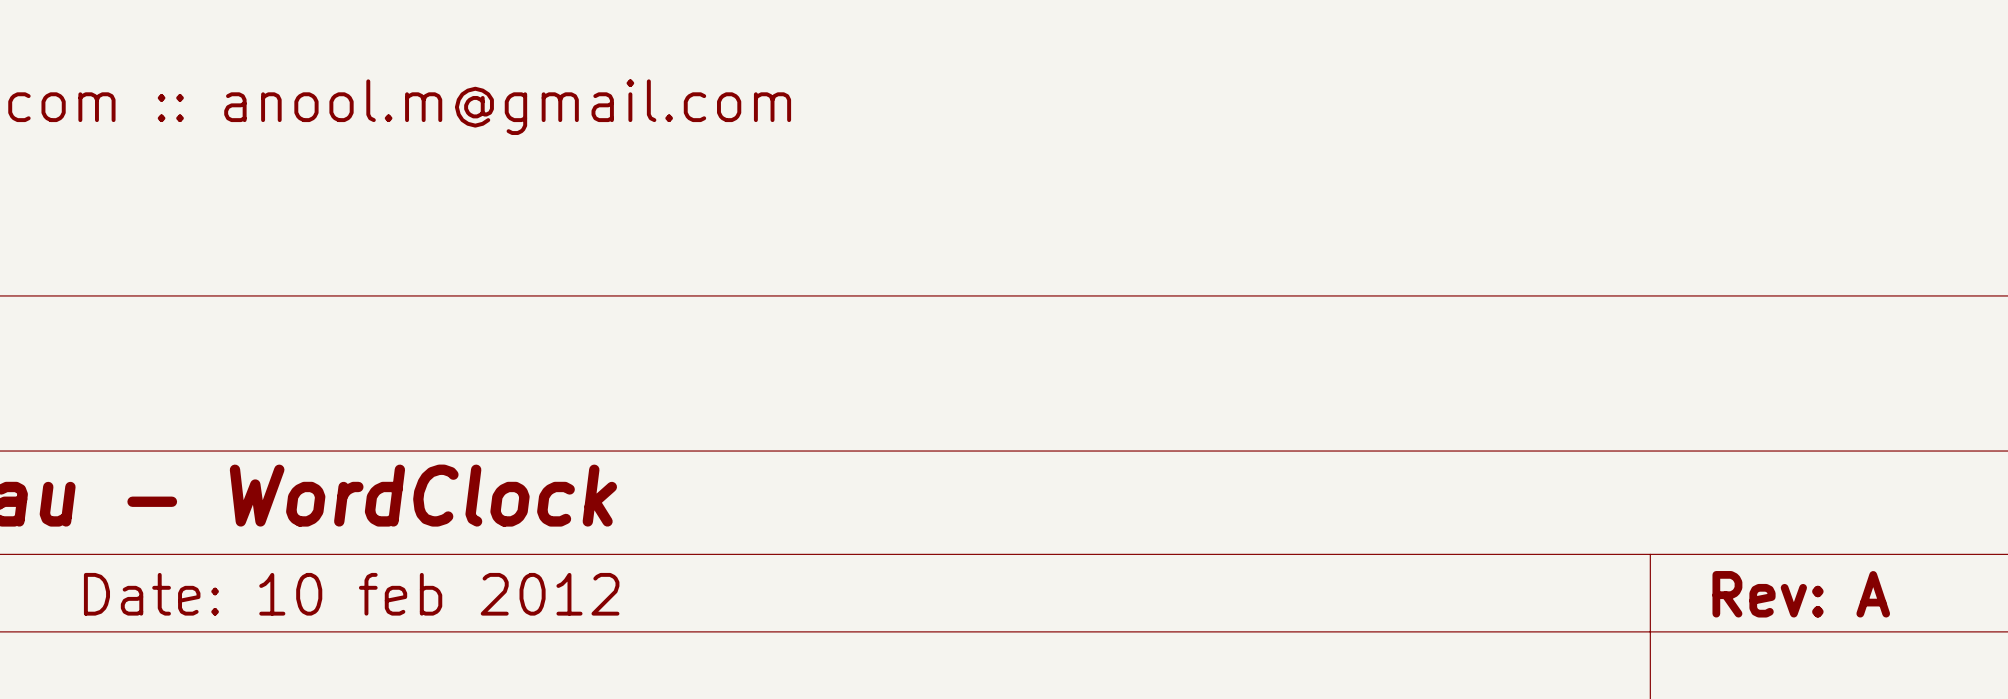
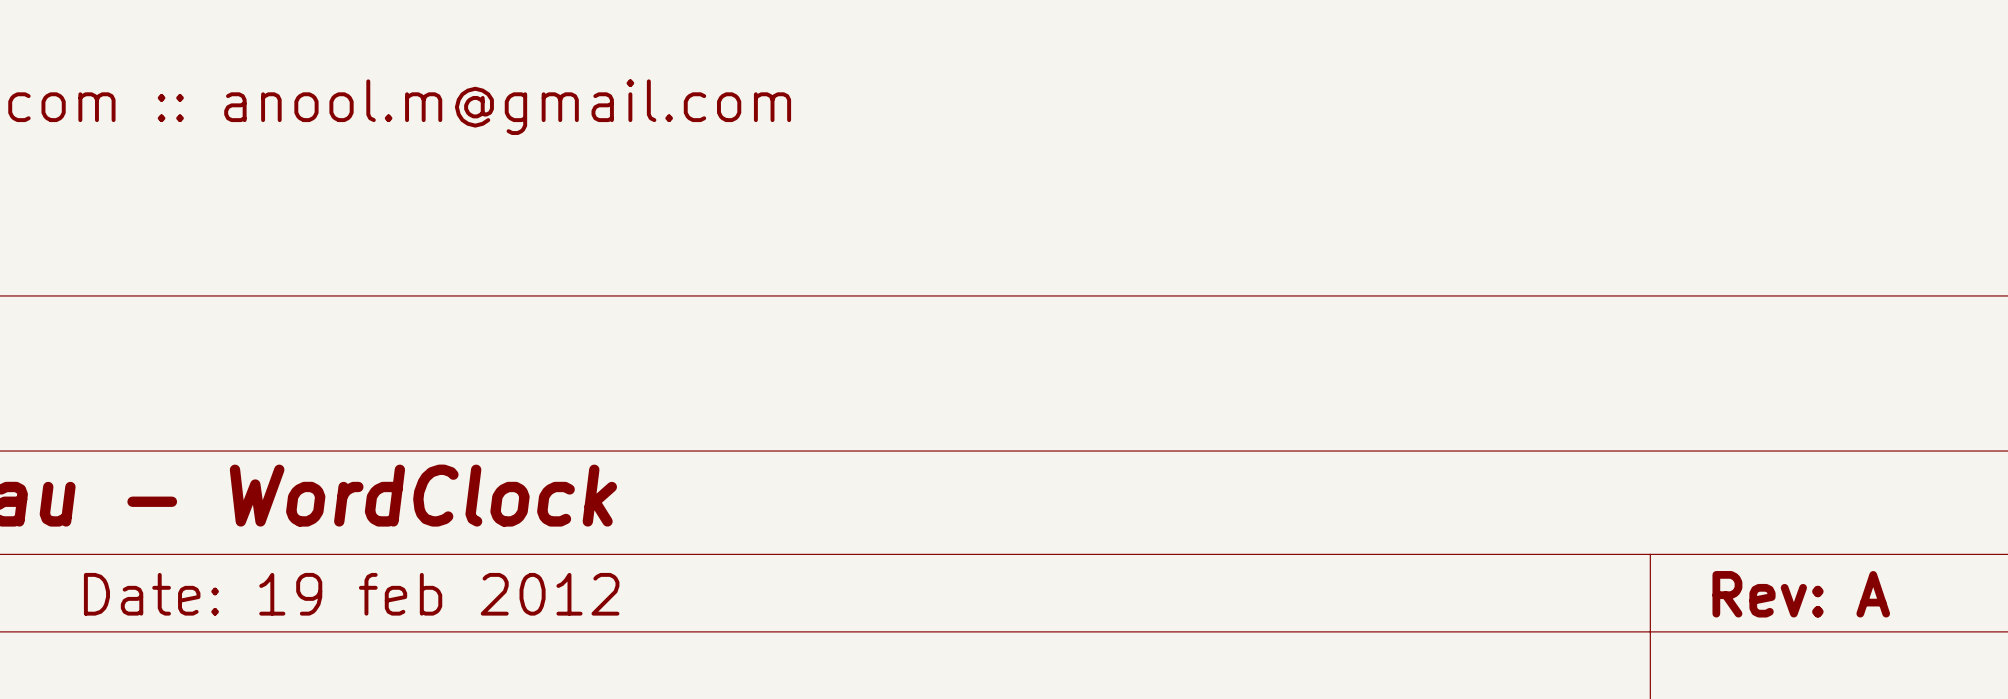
title block: Date: 10 feb 2012 (351, 594) -> Date: 19 feb 2012 (351, 594)

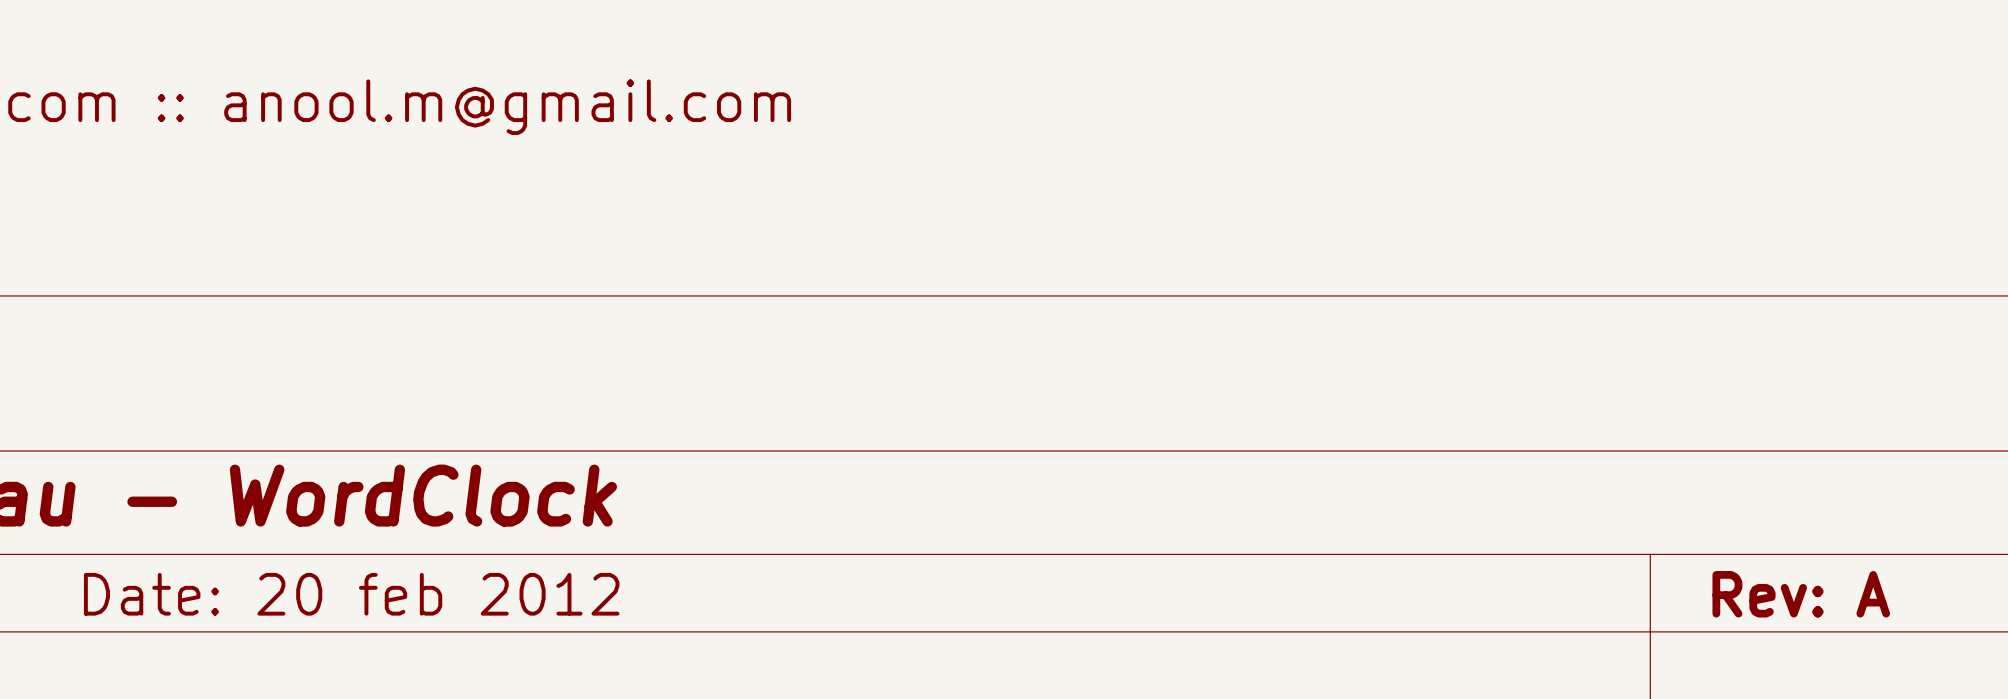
title block: Date: 19 feb 2012 (351, 594) -> Date: 20 feb 2012 (351, 594)

